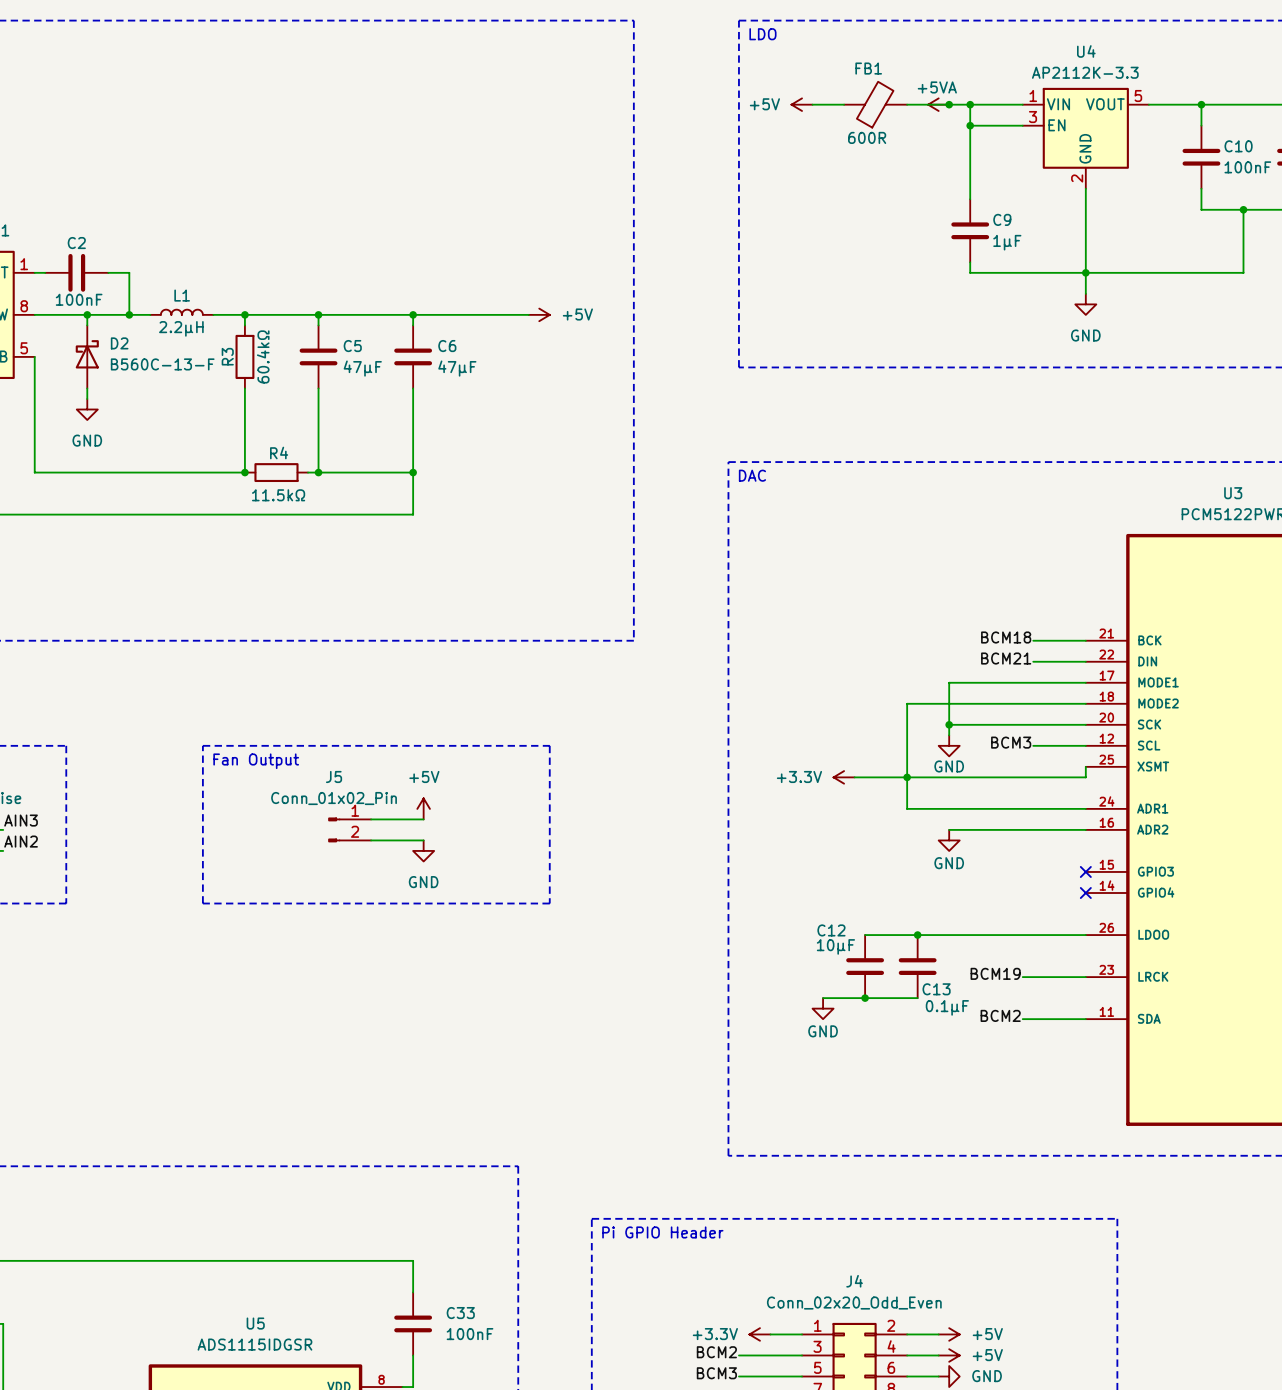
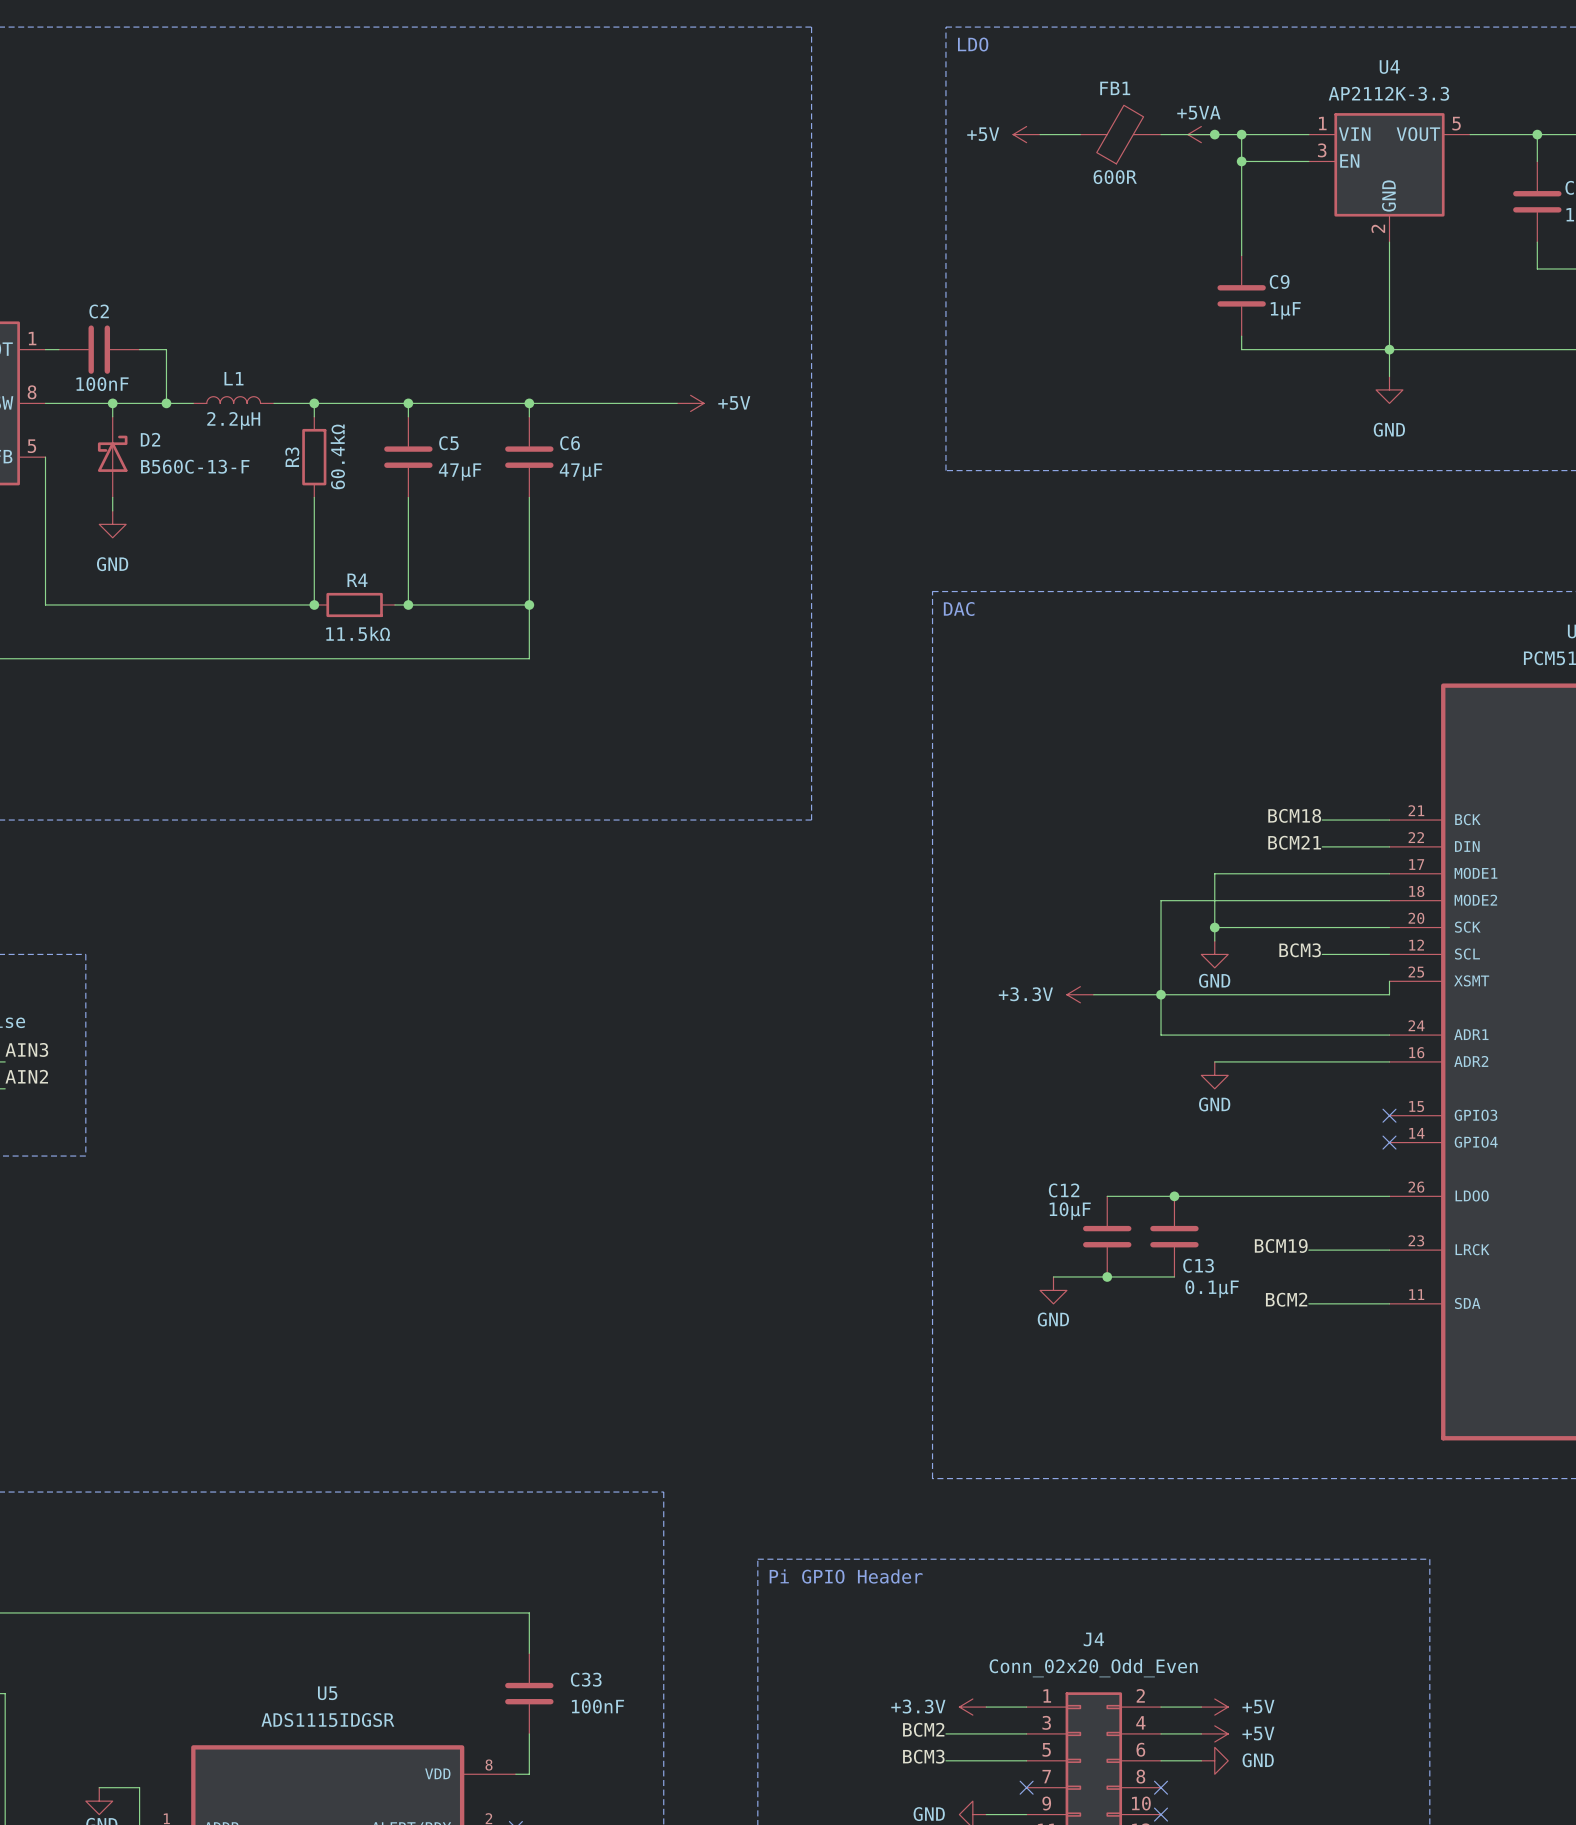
line: (202, 745) (549, 745) (549, 903) (202, 903) (202, 745) -> none
text: Fan Output (256, 761) -> none
power symbol: +5V (423, 808) -> none
wire: (371, 819) (423, 819) -> none
J5: Conn_01x02_Pin (349, 829) -> none
wire: (371, 840) (423, 840) -> none
power symbol: GND (423, 850) -> none

